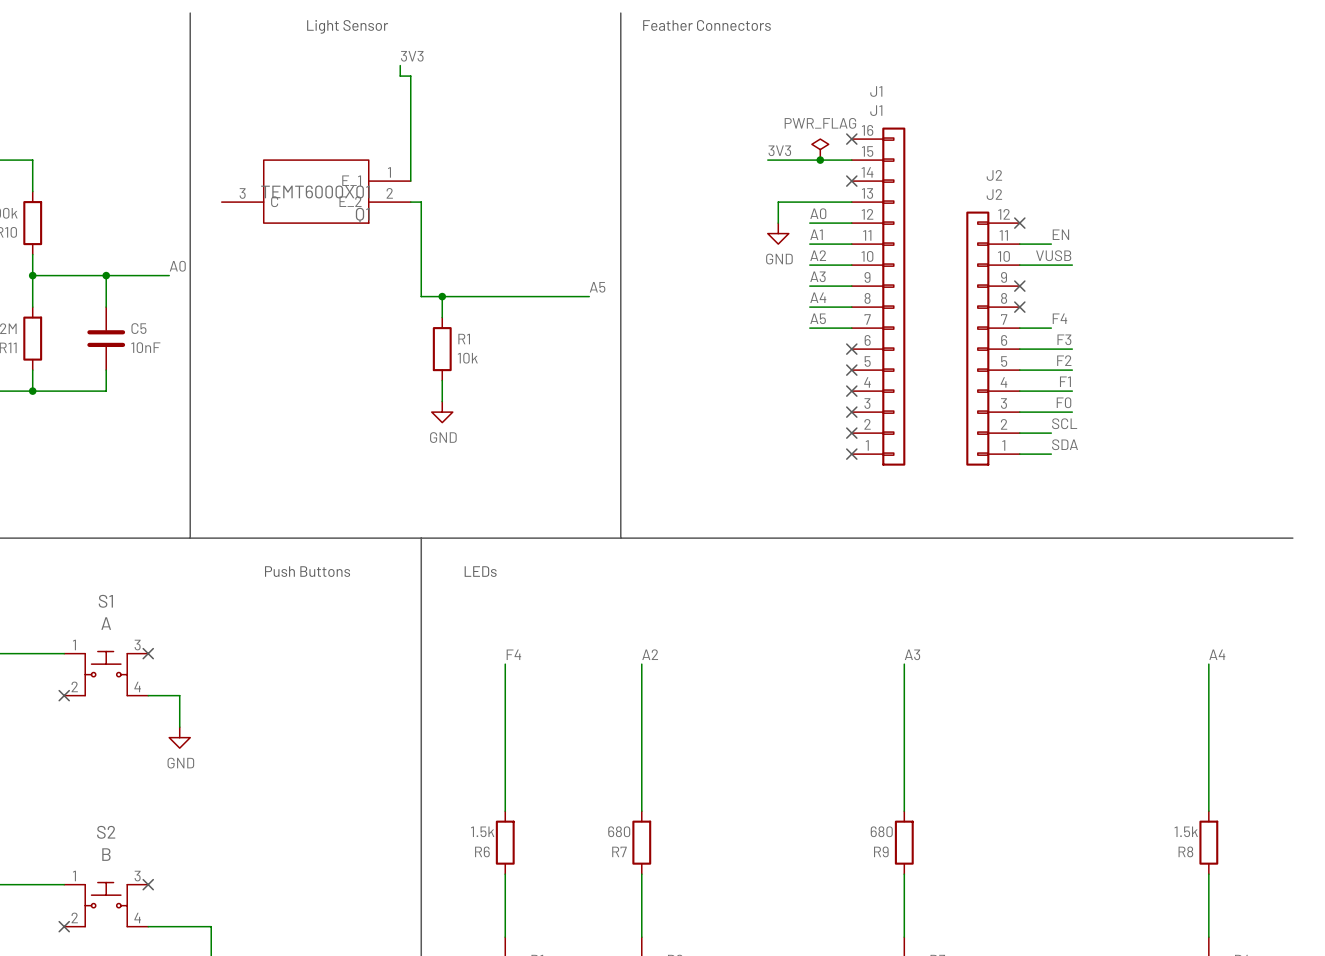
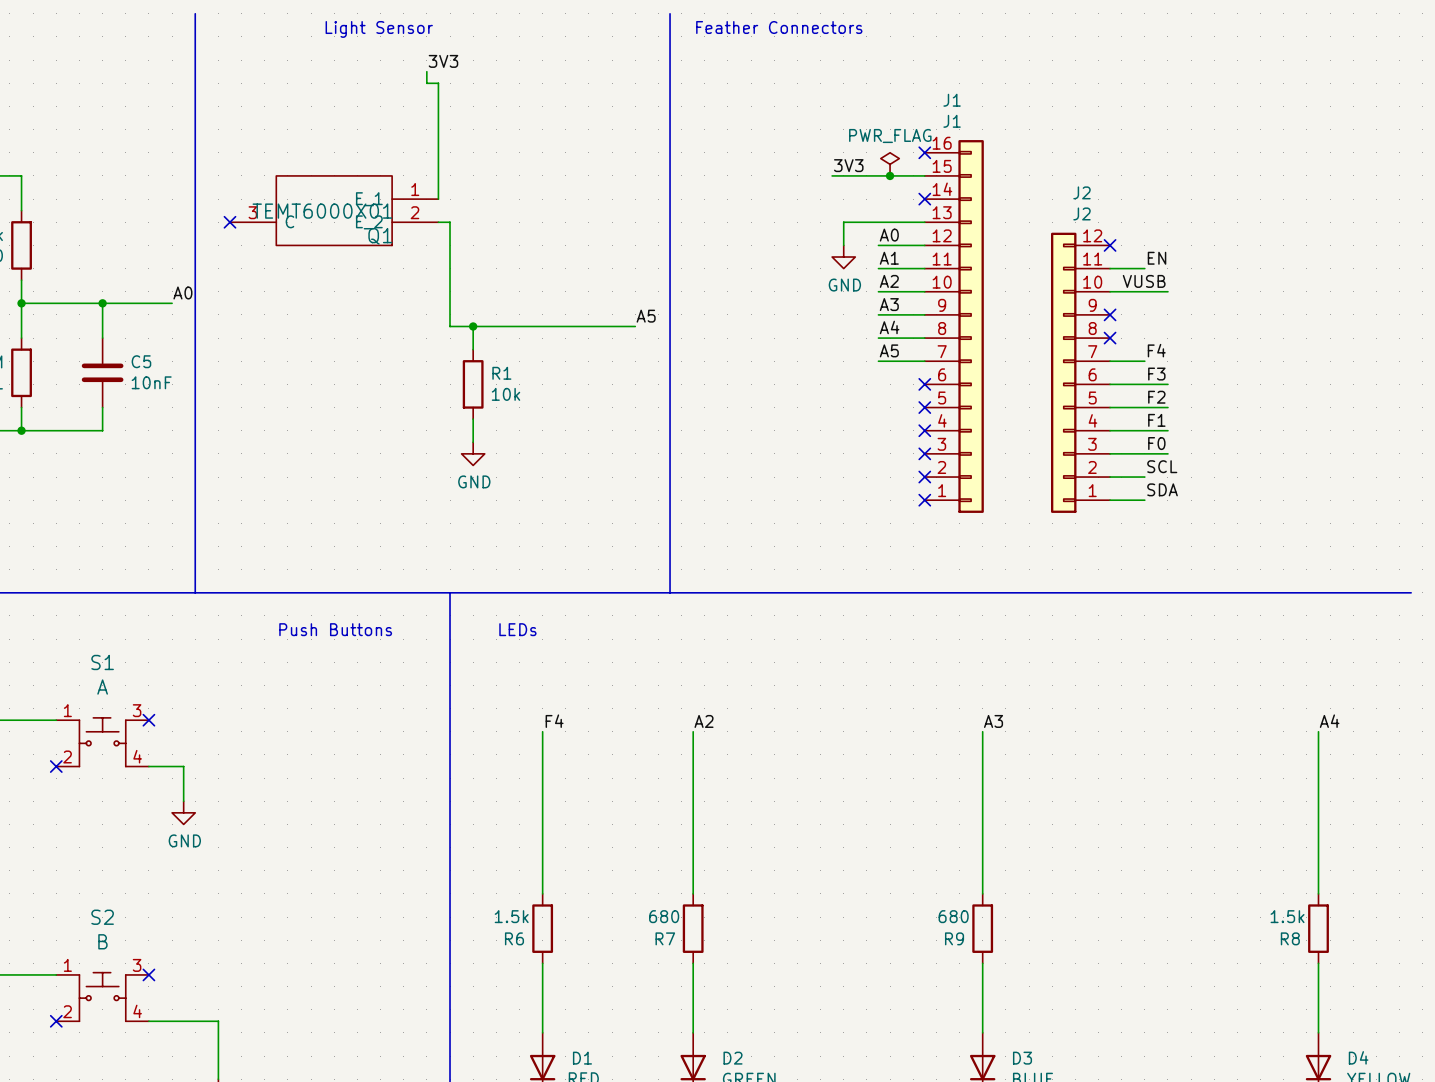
no-connect mark: none -> (229, 222)

